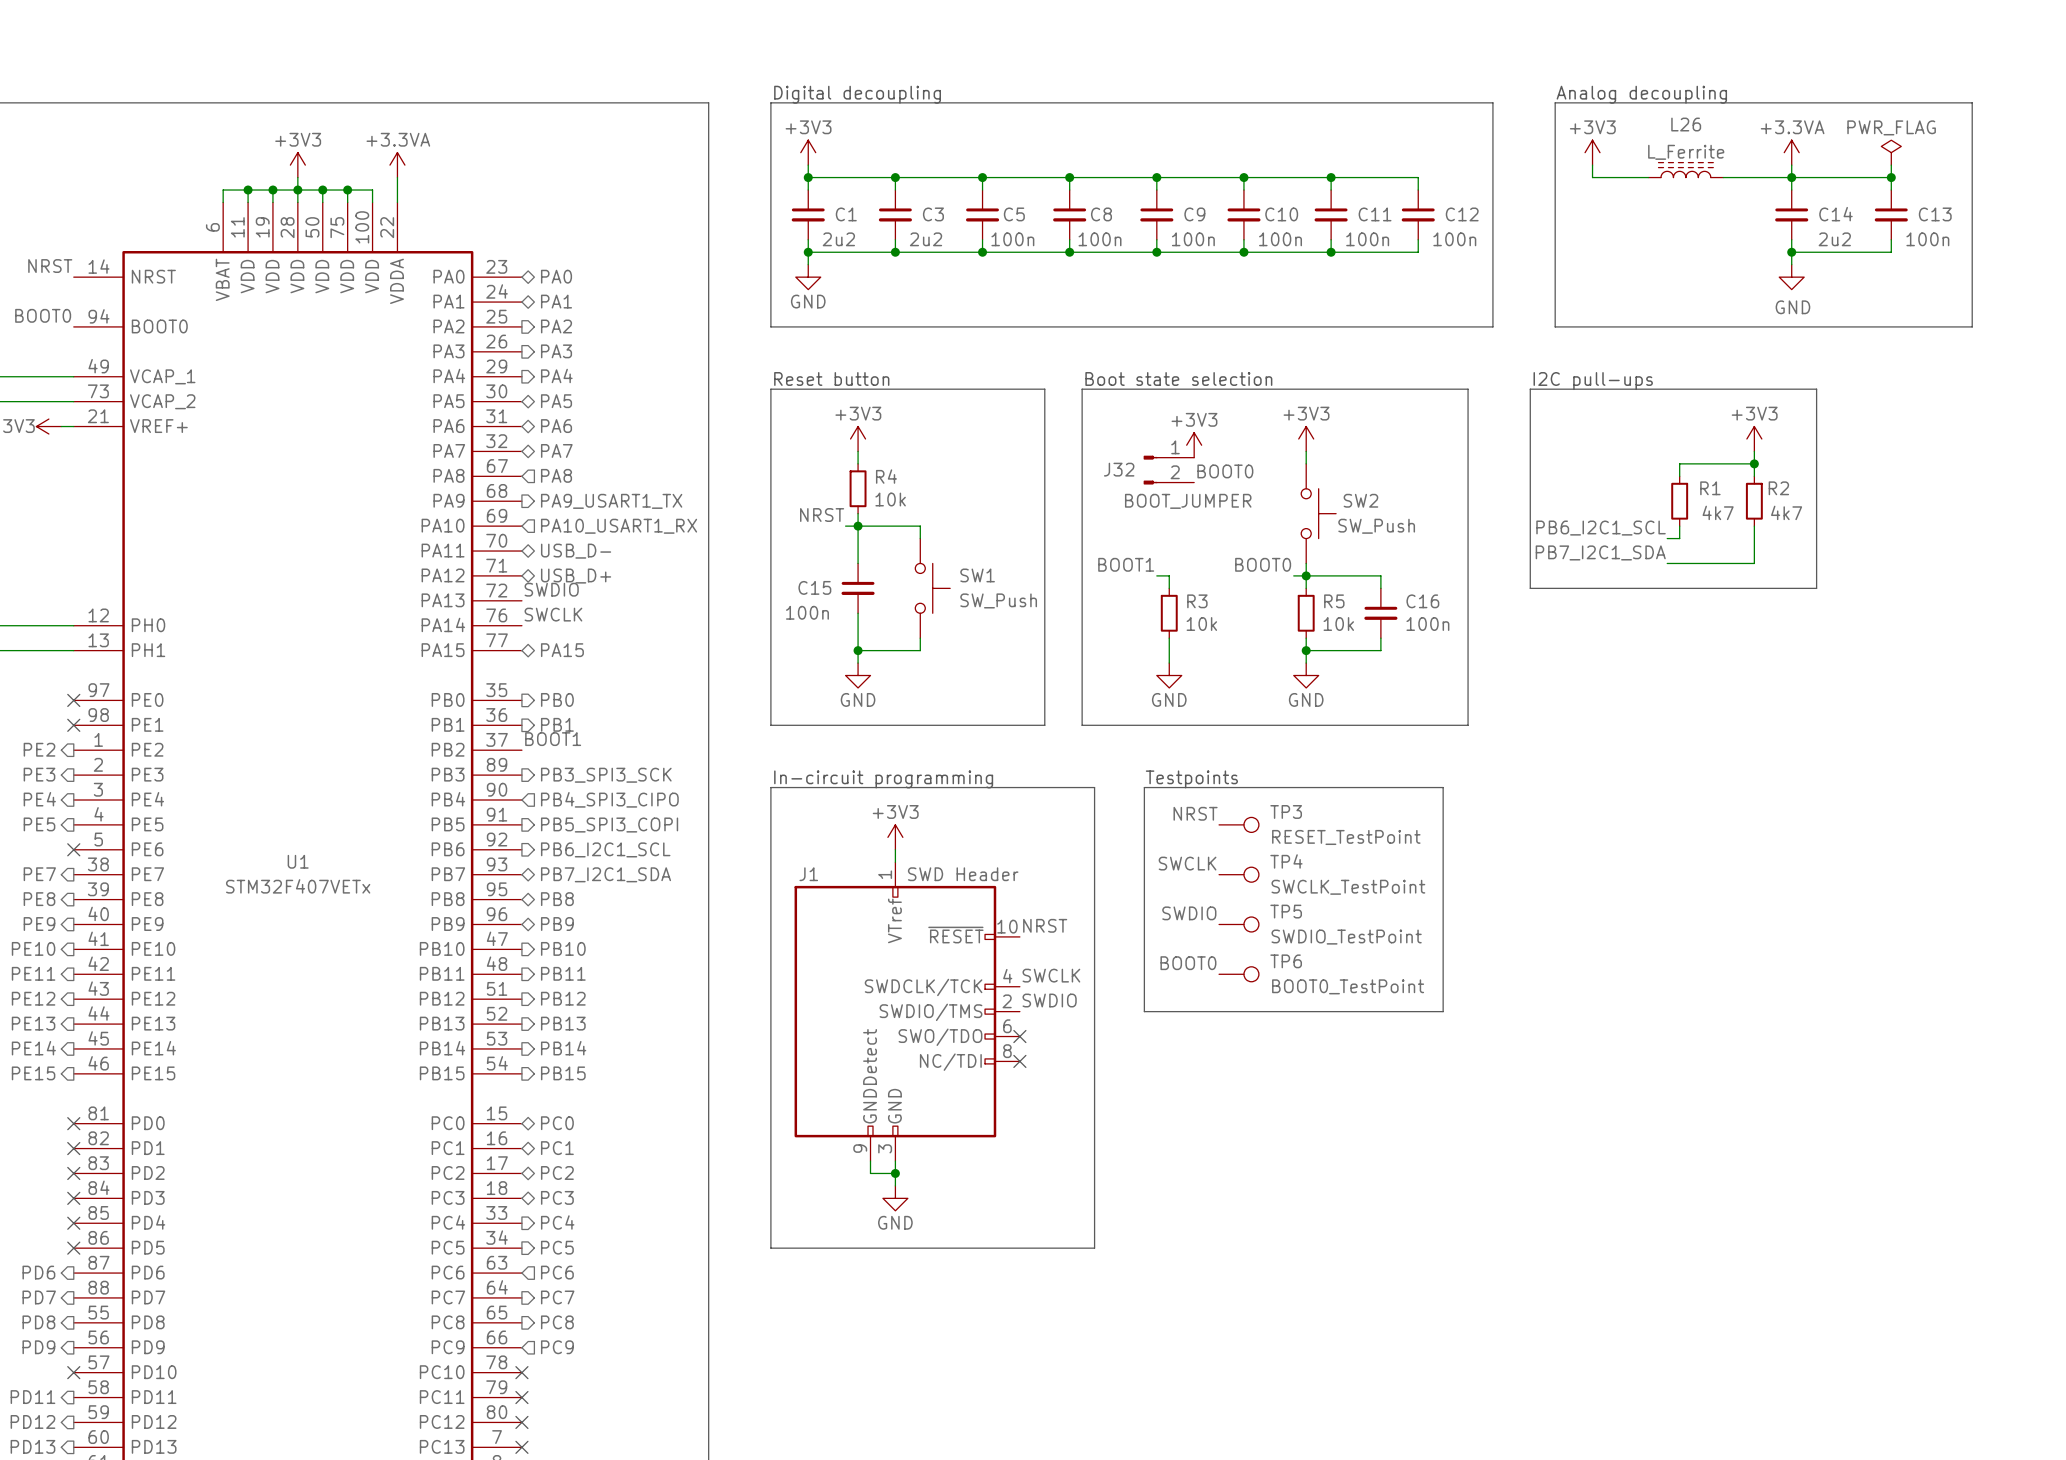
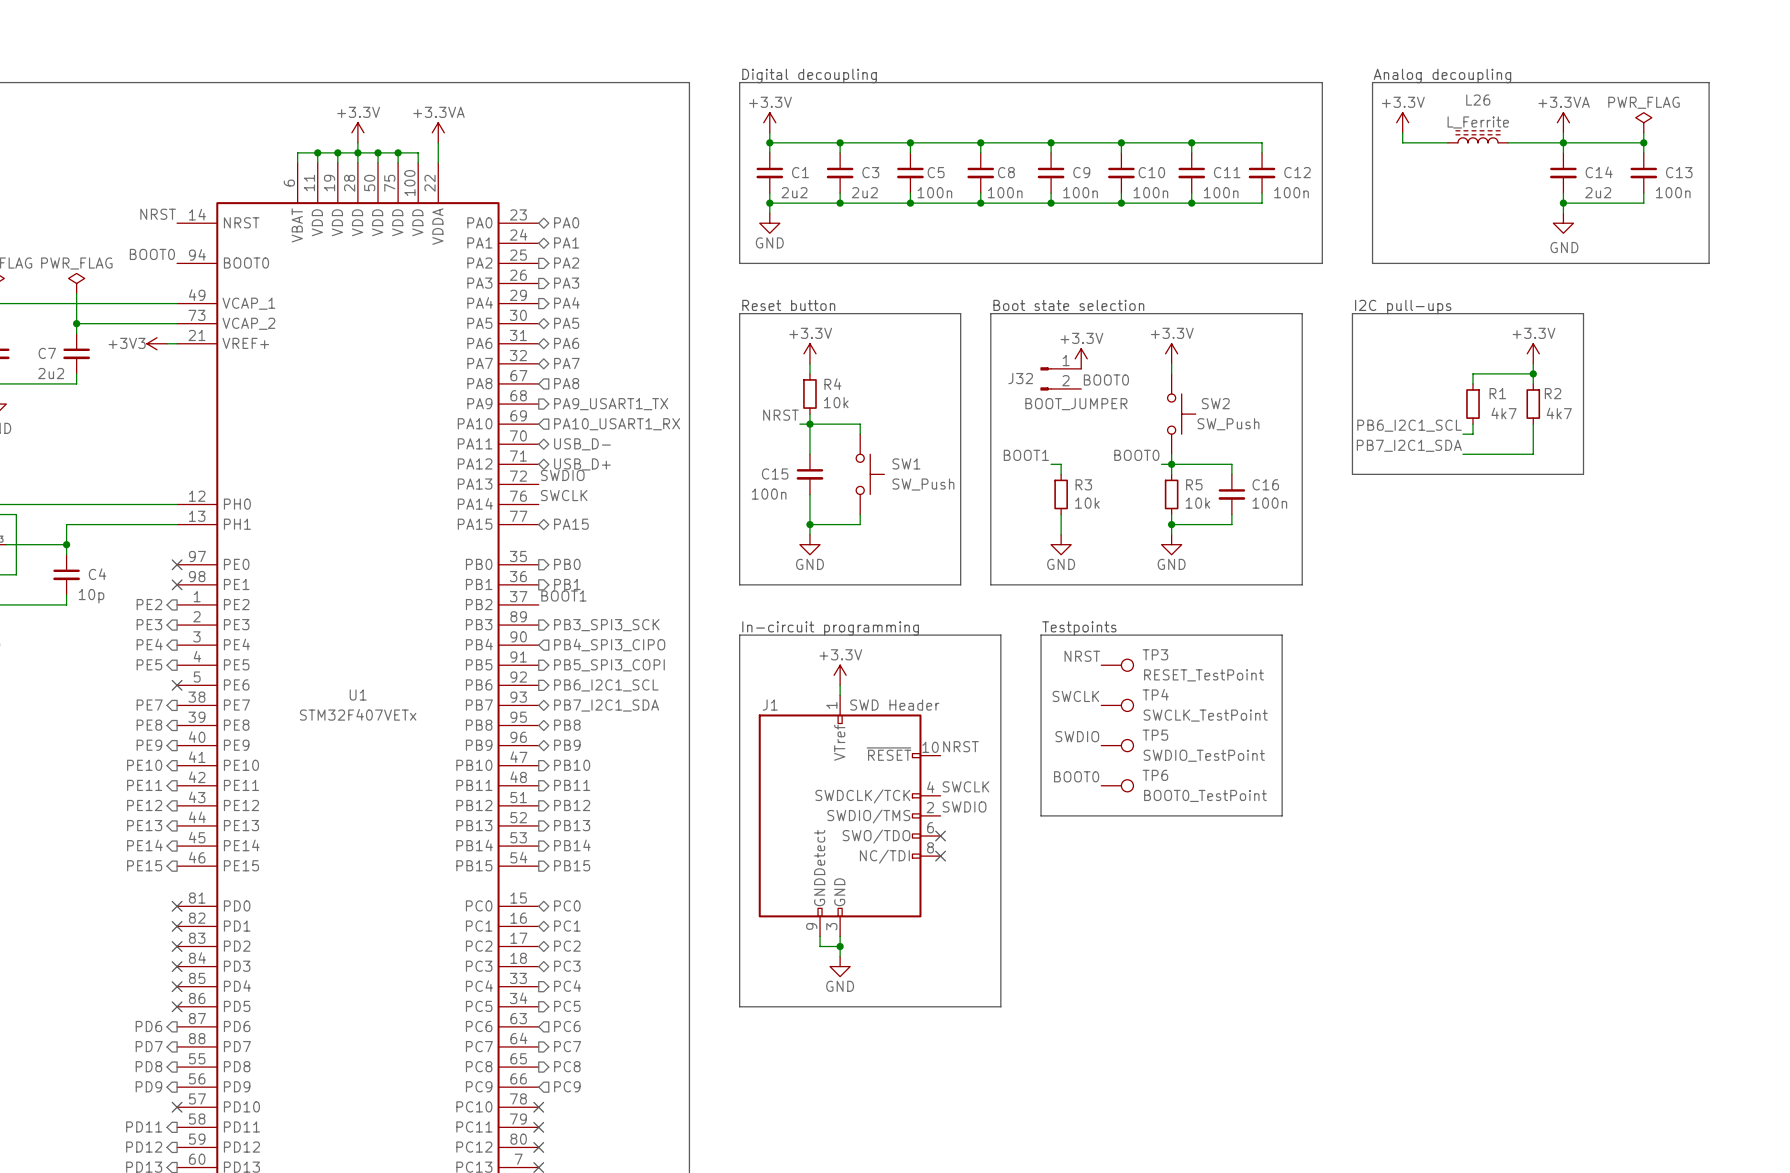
power symbol: +3V3 (808, 152) -> +3.3V (769, 122)
power symbol: +3V3 (1592, 152) -> +3.3V (1402, 122)
power symbol: +3V3 (297, 165) -> +3.3V (357, 132)
power symbol: +3V3 (858, 438) -> +3.3V (809, 353)
power symbol: +3V3 (1306, 438) -> +3.3V (1171, 353)
power symbol: +3V3 (1754, 438) -> +3.3V (1533, 353)
power symbol: +3V3 (1194, 445) -> +3.3V (1081, 358)
power symbol: +3V3 (895, 837) -> +3.3V (840, 675)

